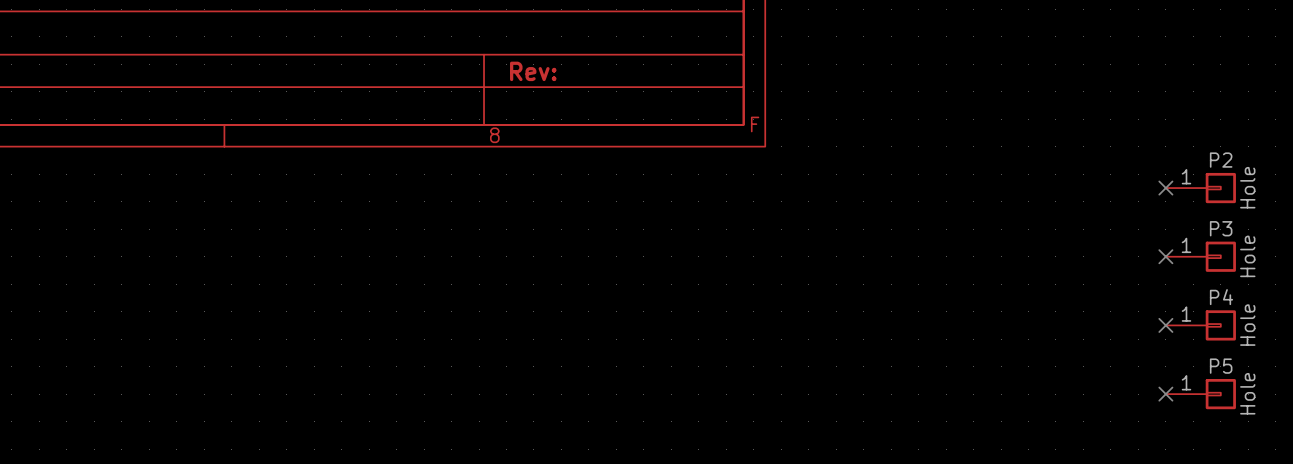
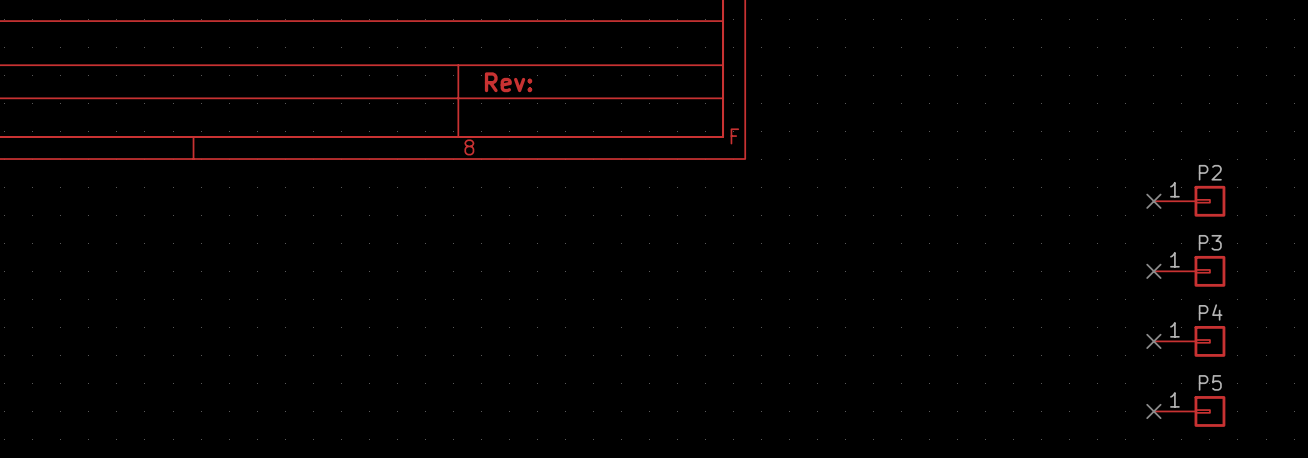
P2 value: Hole (1247, 187) -> none
P3 value: Hole (1247, 256) -> none
P4 value: Hole (1247, 325) -> none
P5 value: Hole (1247, 393) -> none

